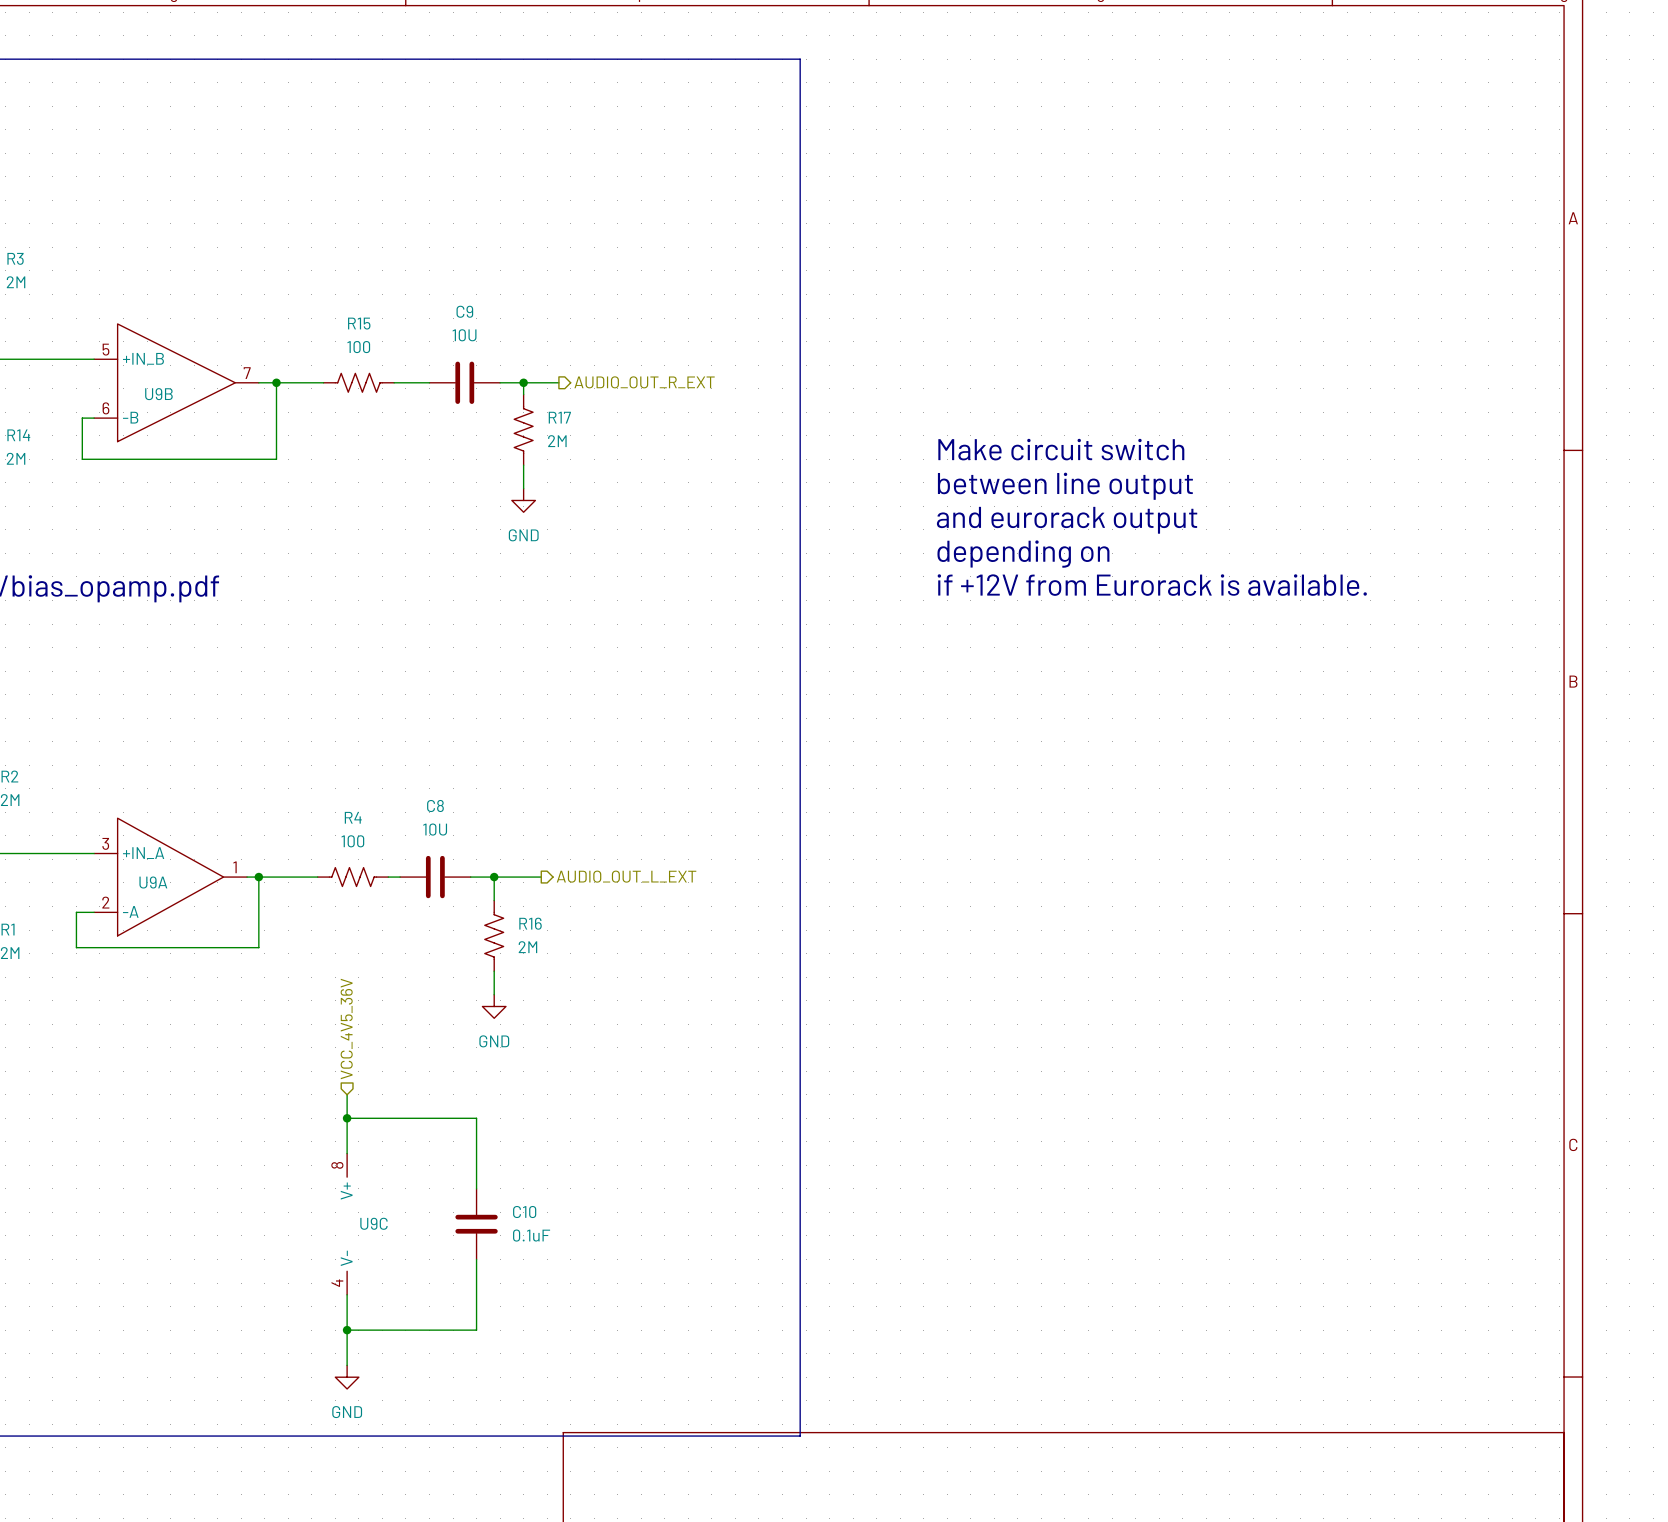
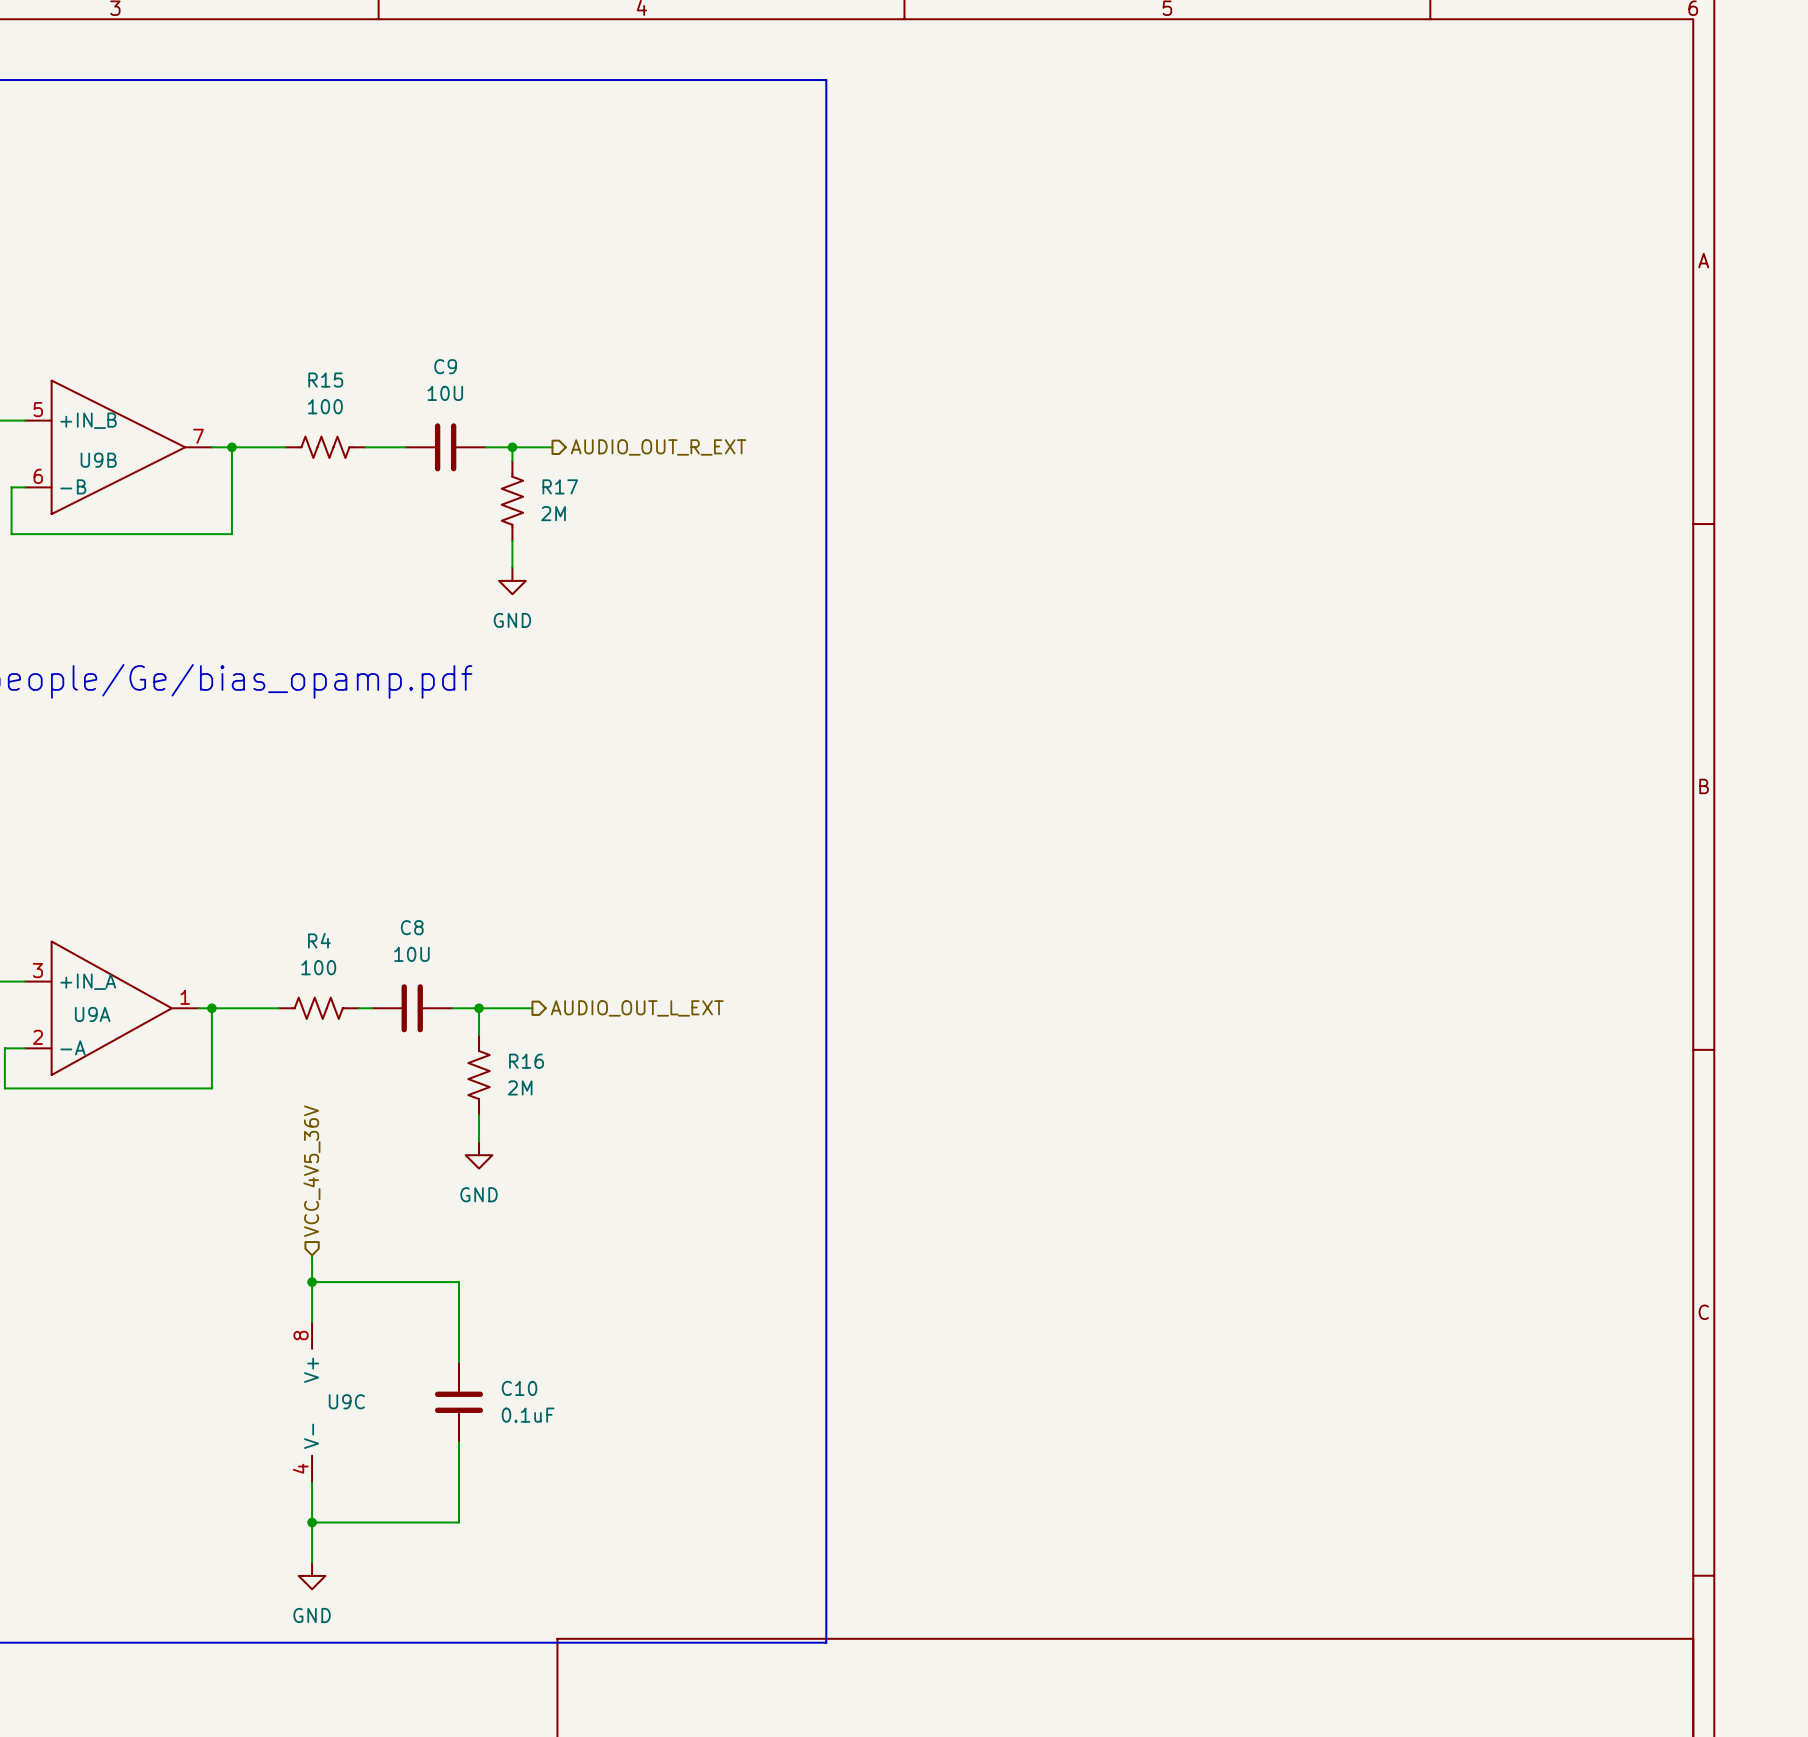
text: Make circuit switch (1061, 449) -> none
text: between line output (1065, 486) -> none
text: and eurorack output (1067, 520) -> none
text: depending on (1023, 554) -> none
text: if +12V from Eurorack is available. (1152, 585) -> none

